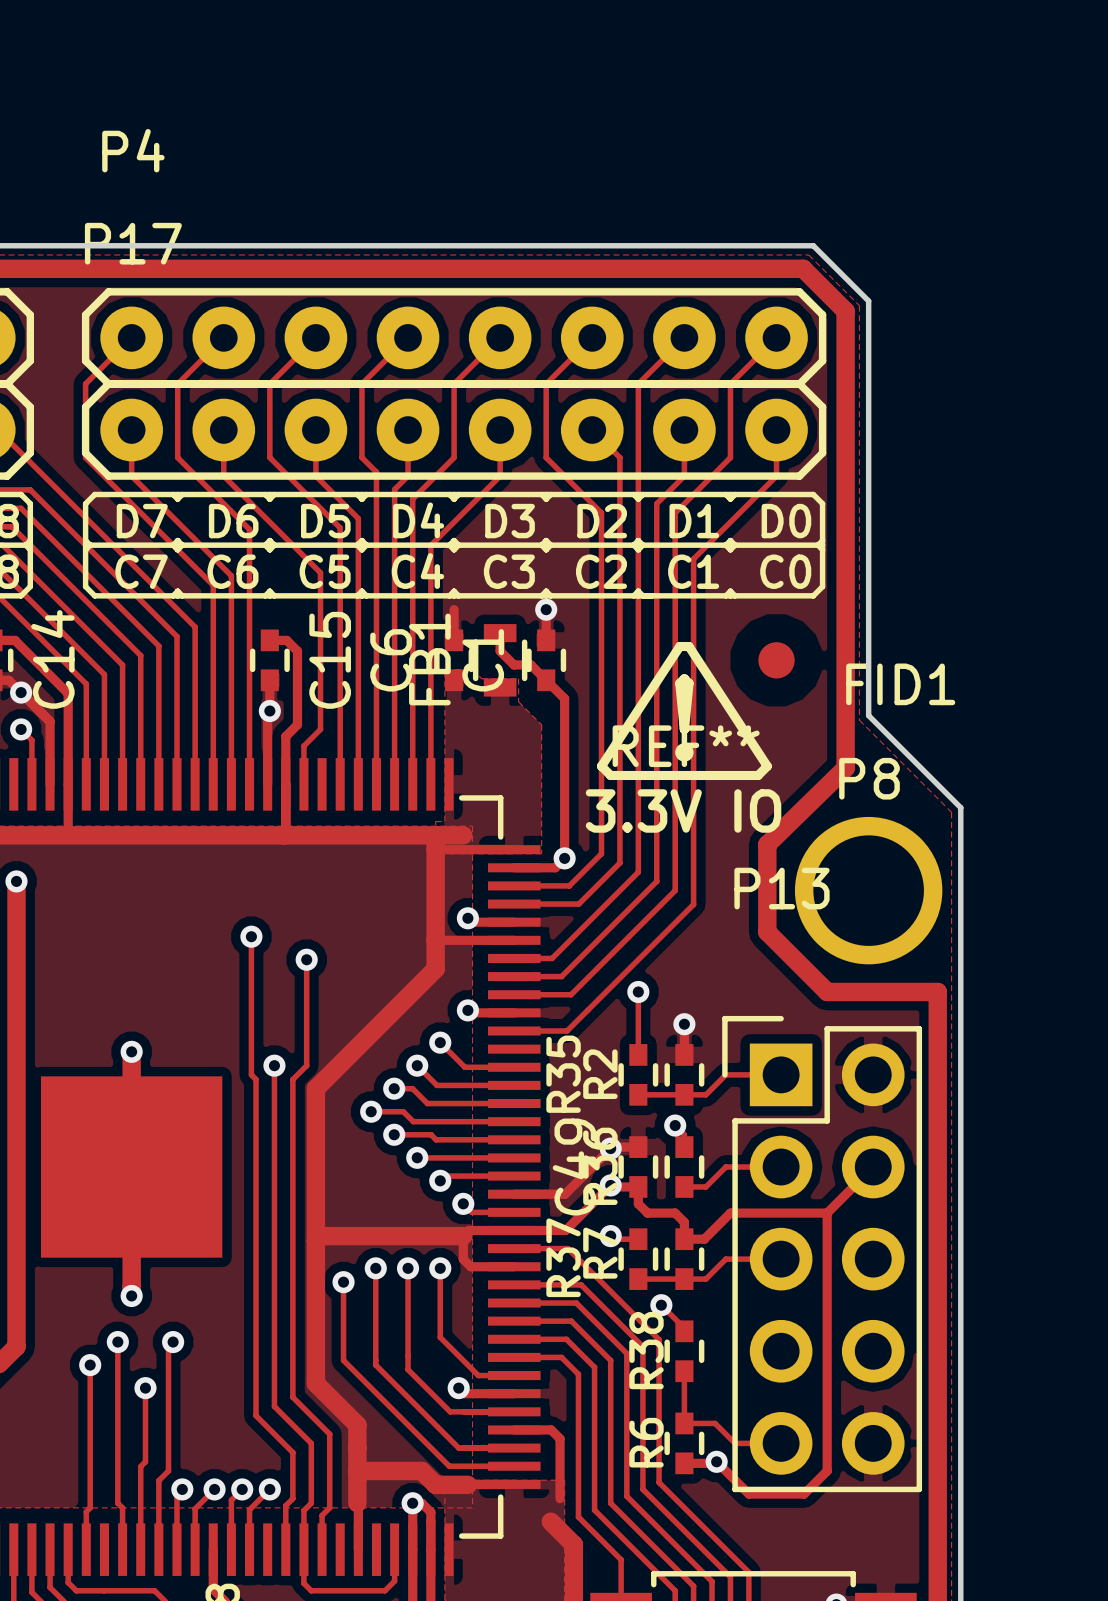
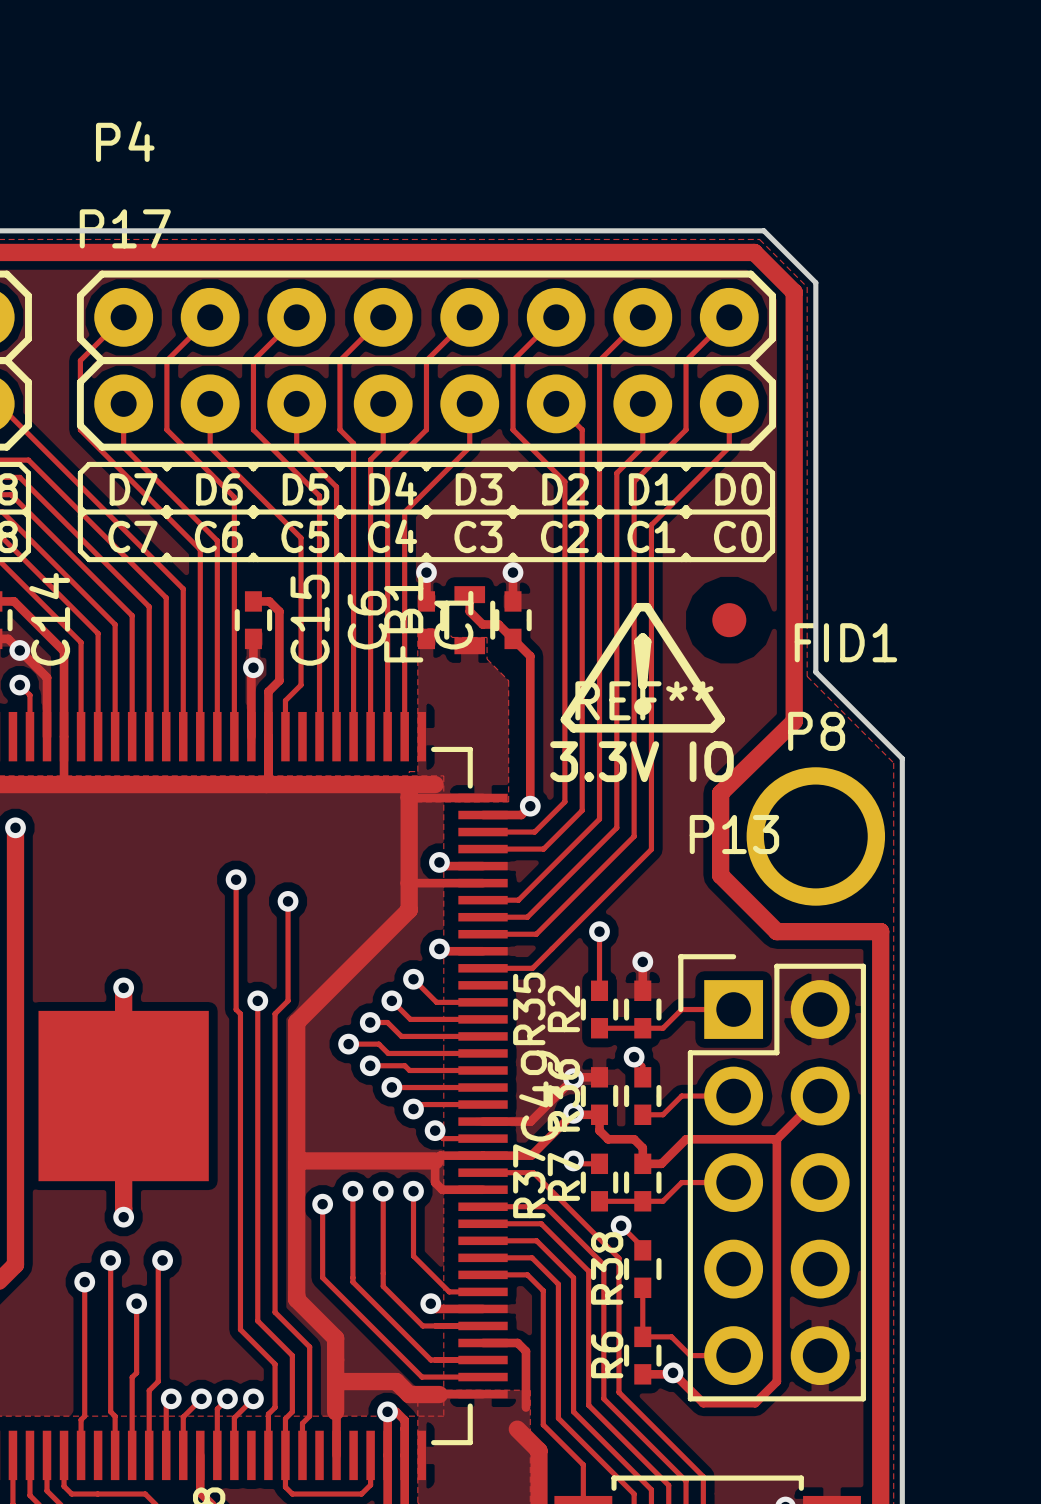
via: none -> (426, 572)

